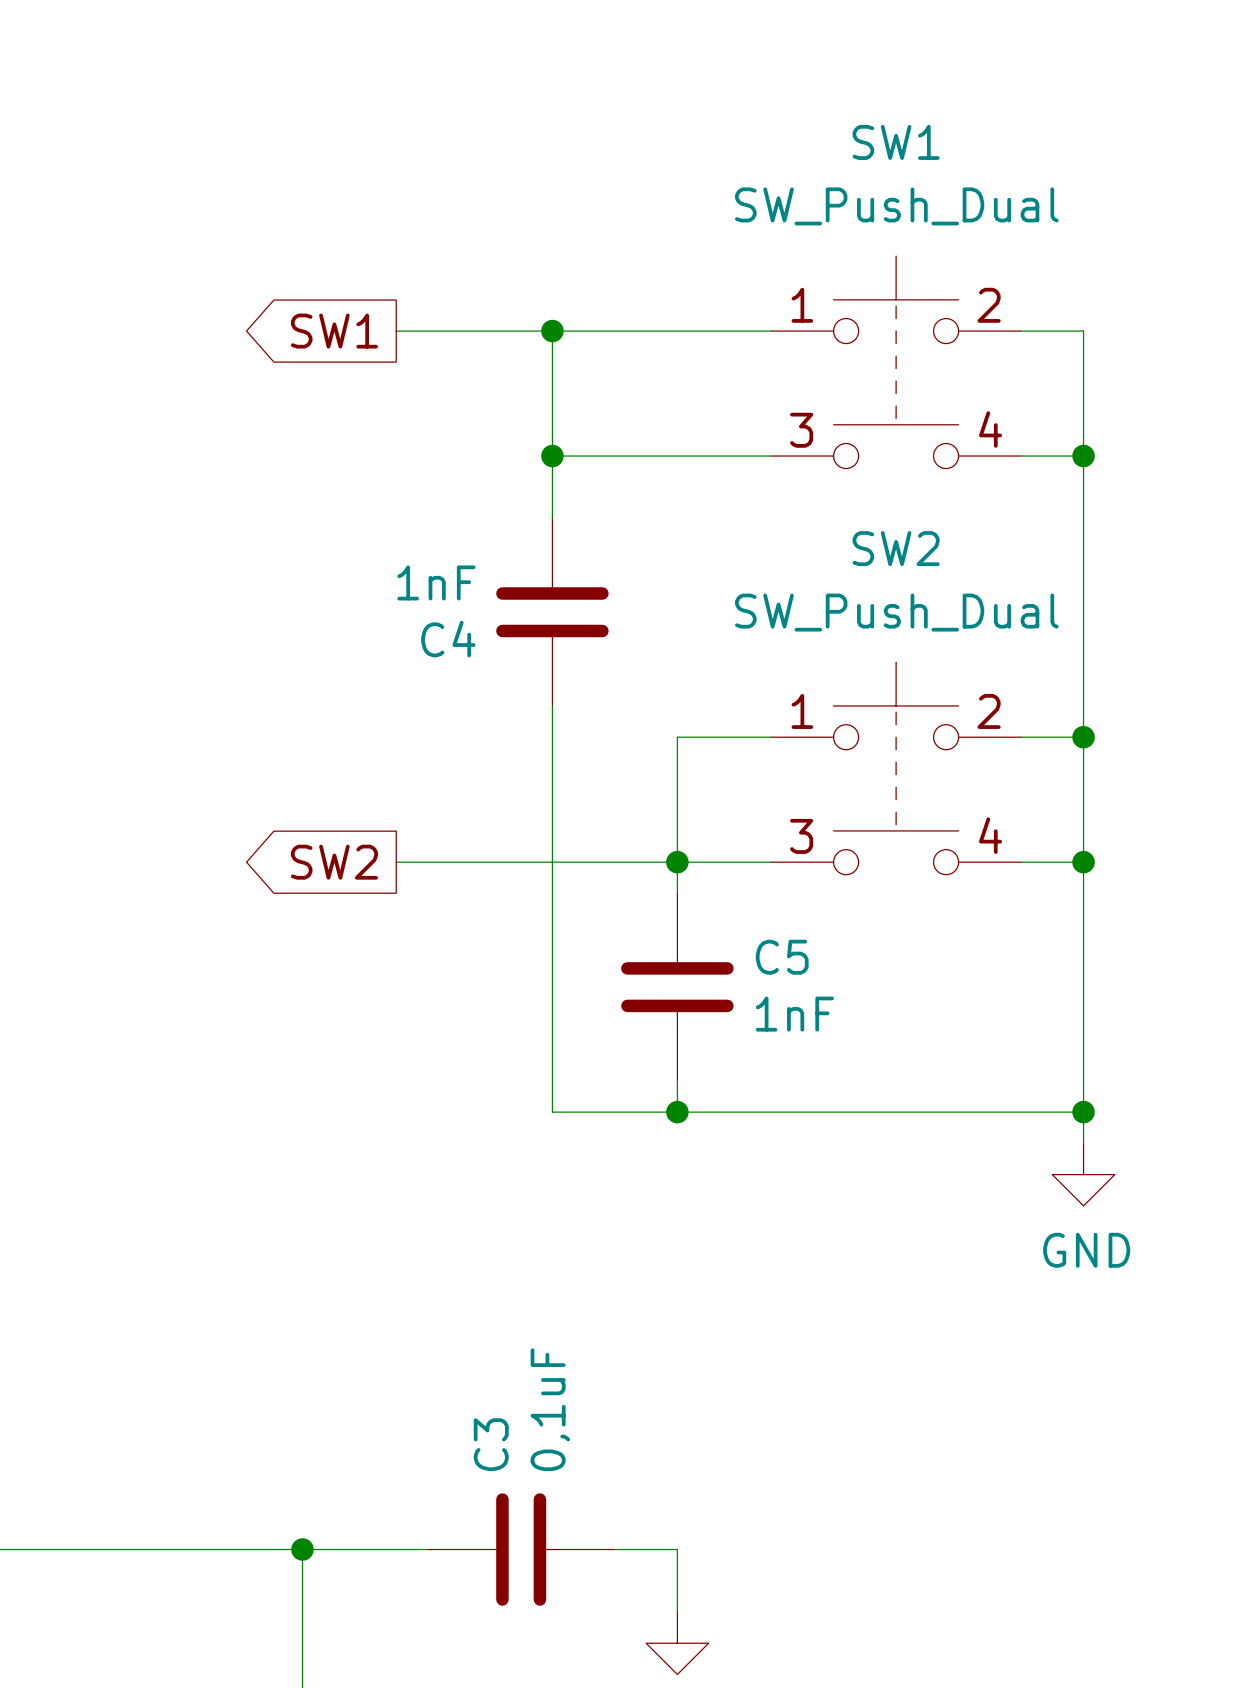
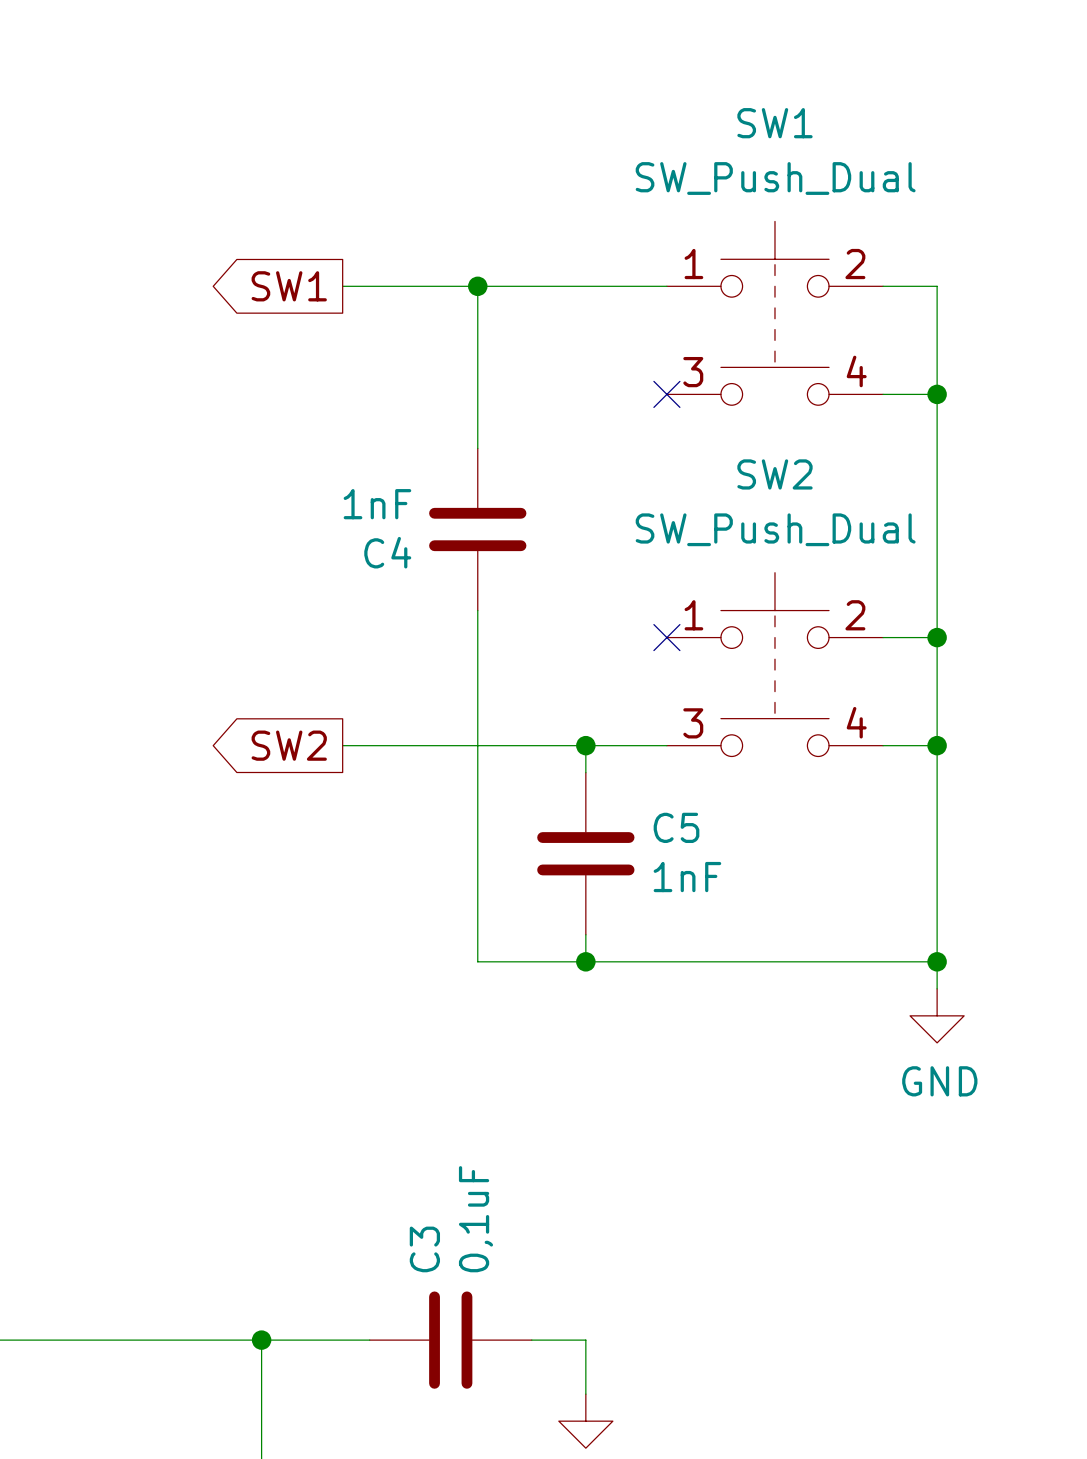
wire: (552, 456) (771, 456) -> none
junction: (552, 456) -> none
no-connect mark: none -> (666, 394)
wire: (771, 737) (677, 737) (677, 862) -> none
no-connect mark: none -> (666, 637)

